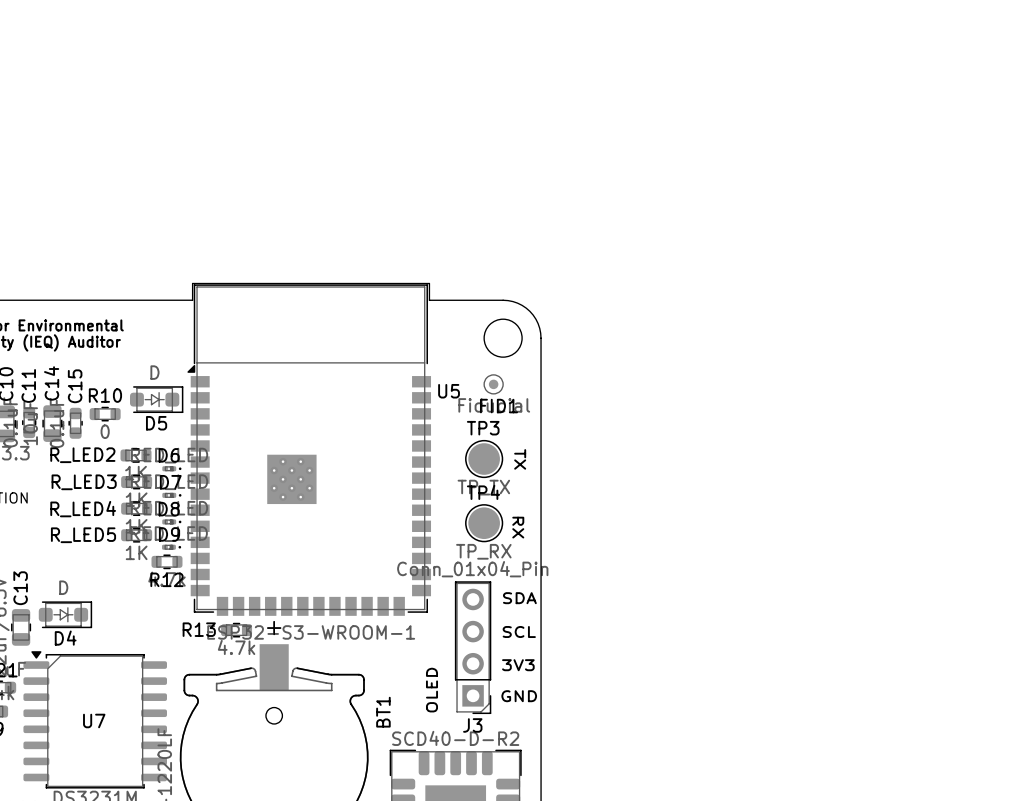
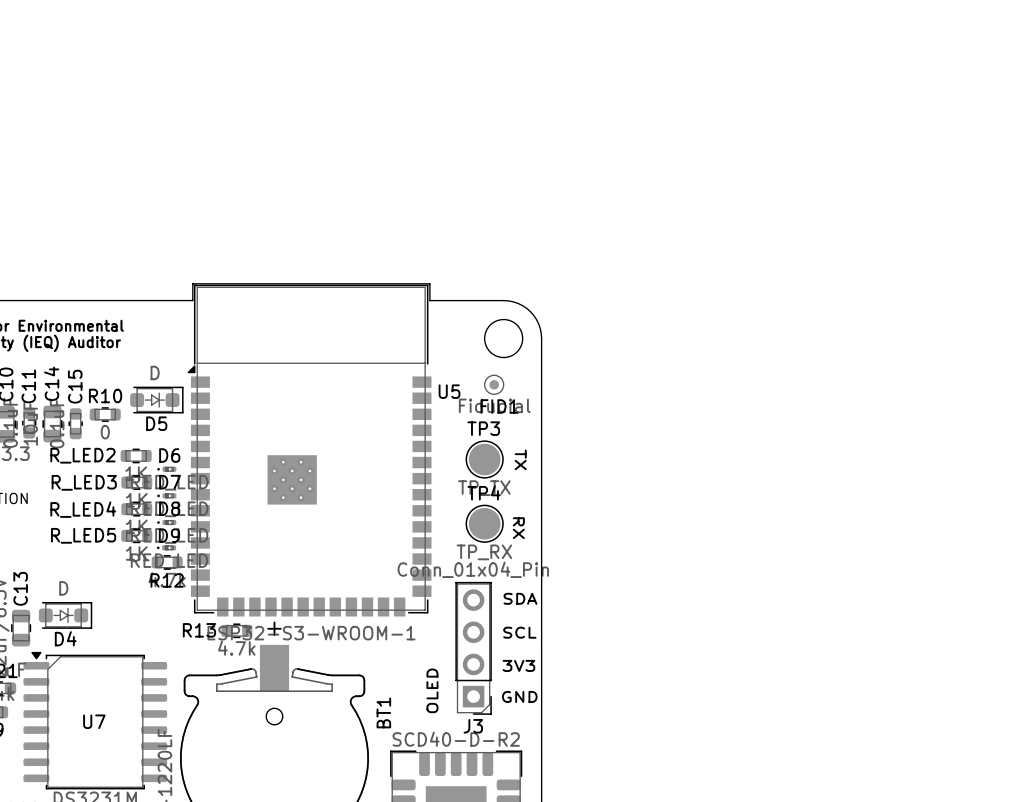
D6 rotation: 0° (171, 468) -> 180° (166, 469)
D7 rotation: 0° (171, 495) -> 180° (166, 495)
D8 rotation: 0° (171, 521) -> 180° (166, 522)
D9 rotation: 0° (171, 547) -> 180° (166, 547)

